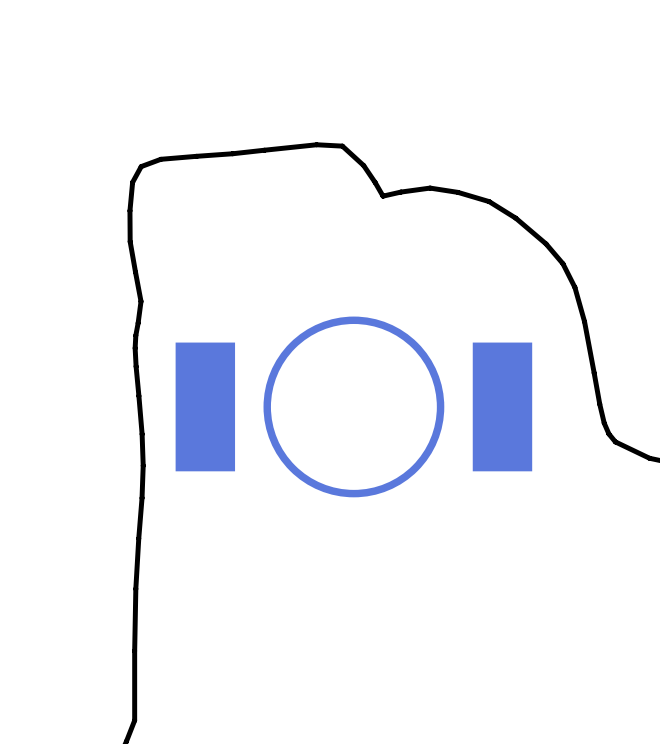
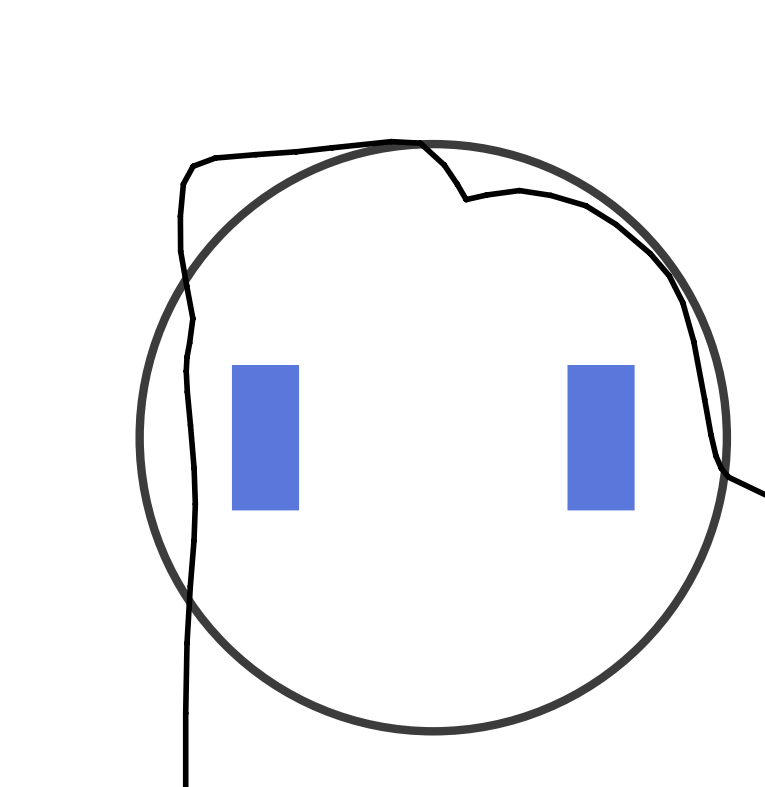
part footprint: [175, 316, 533, 498] -> [135, 139, 732, 736]

